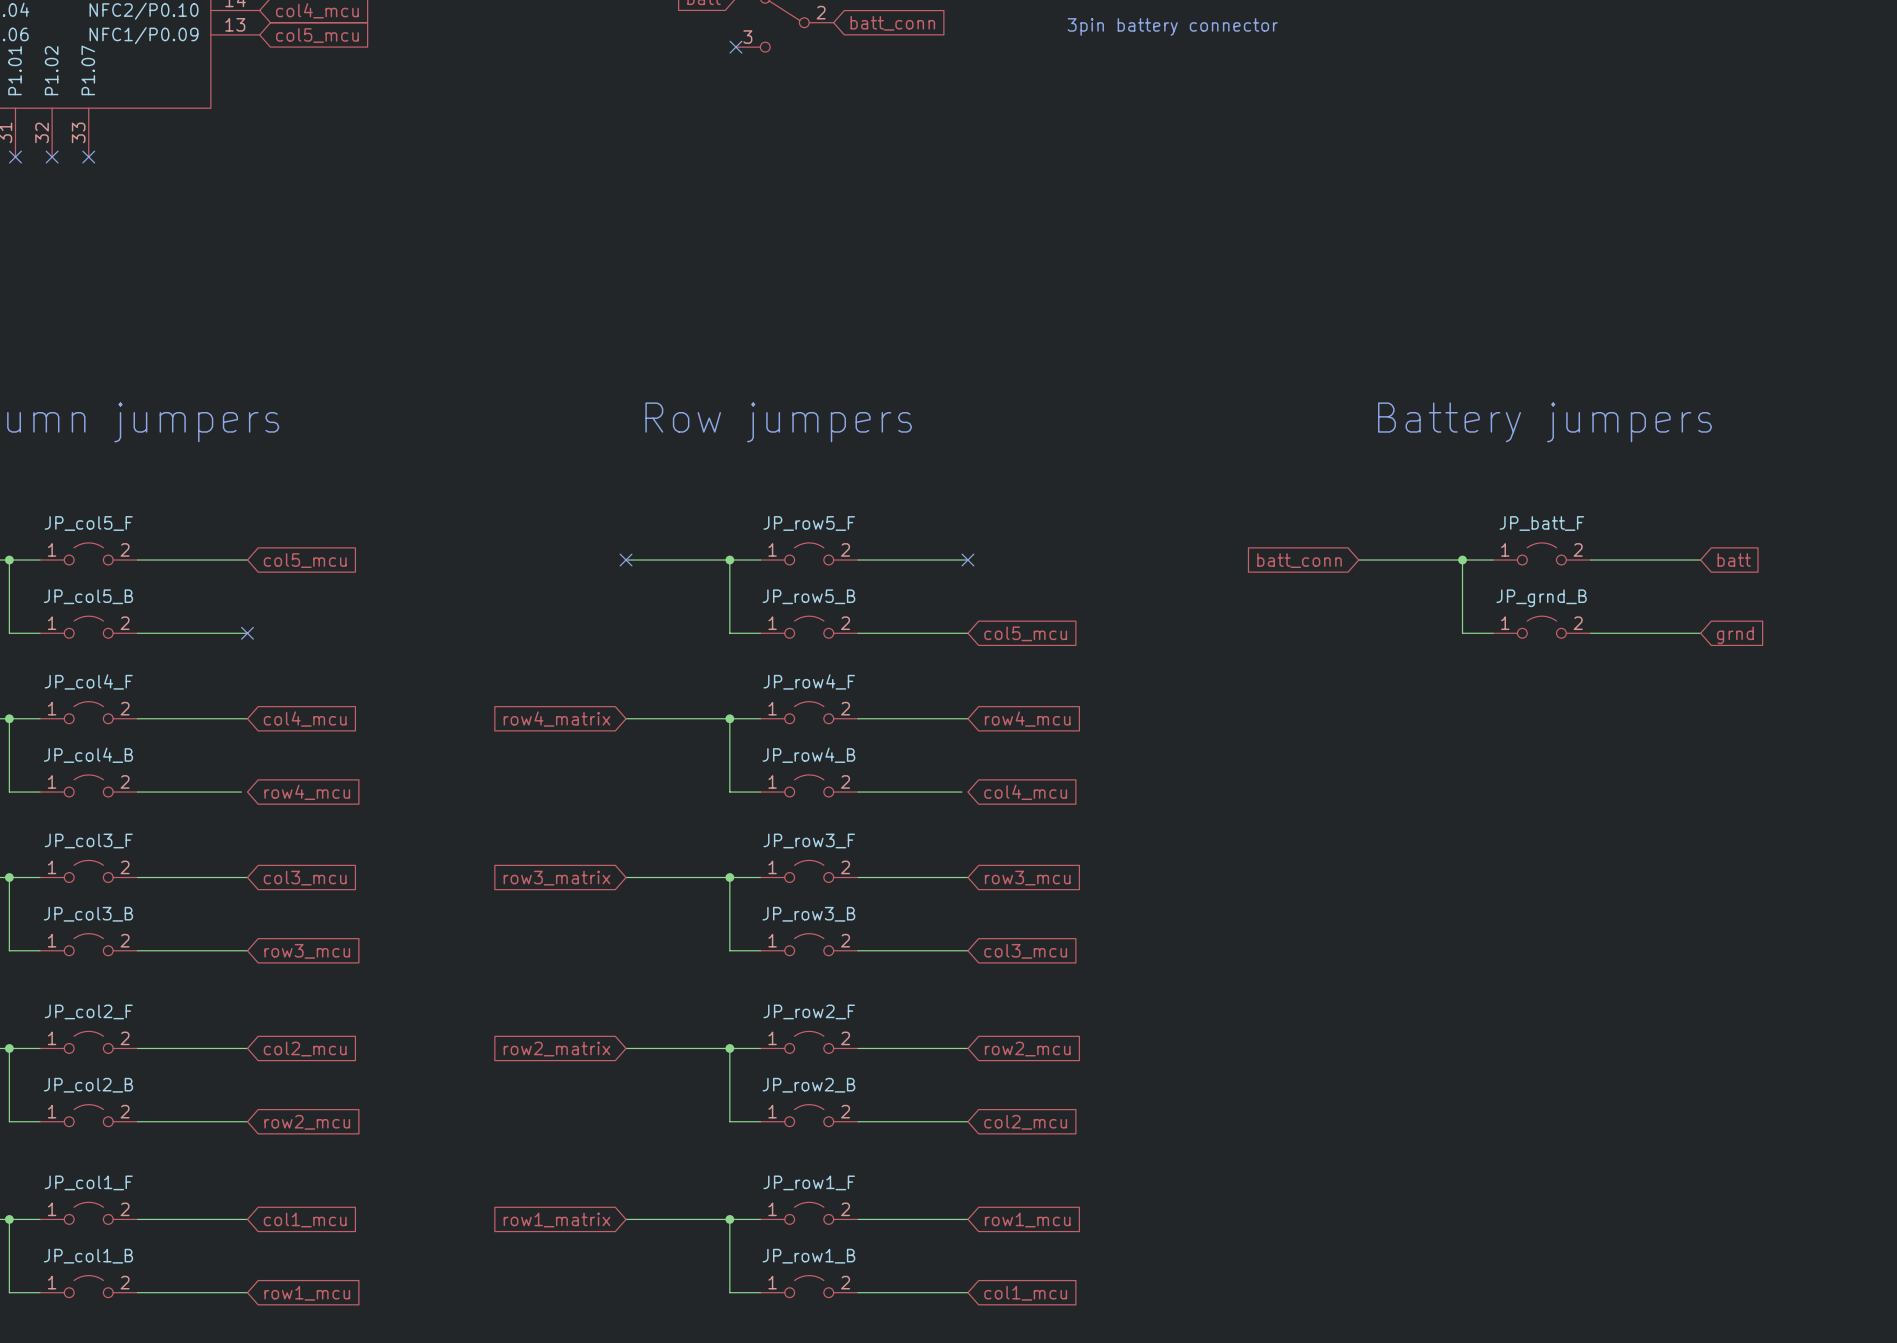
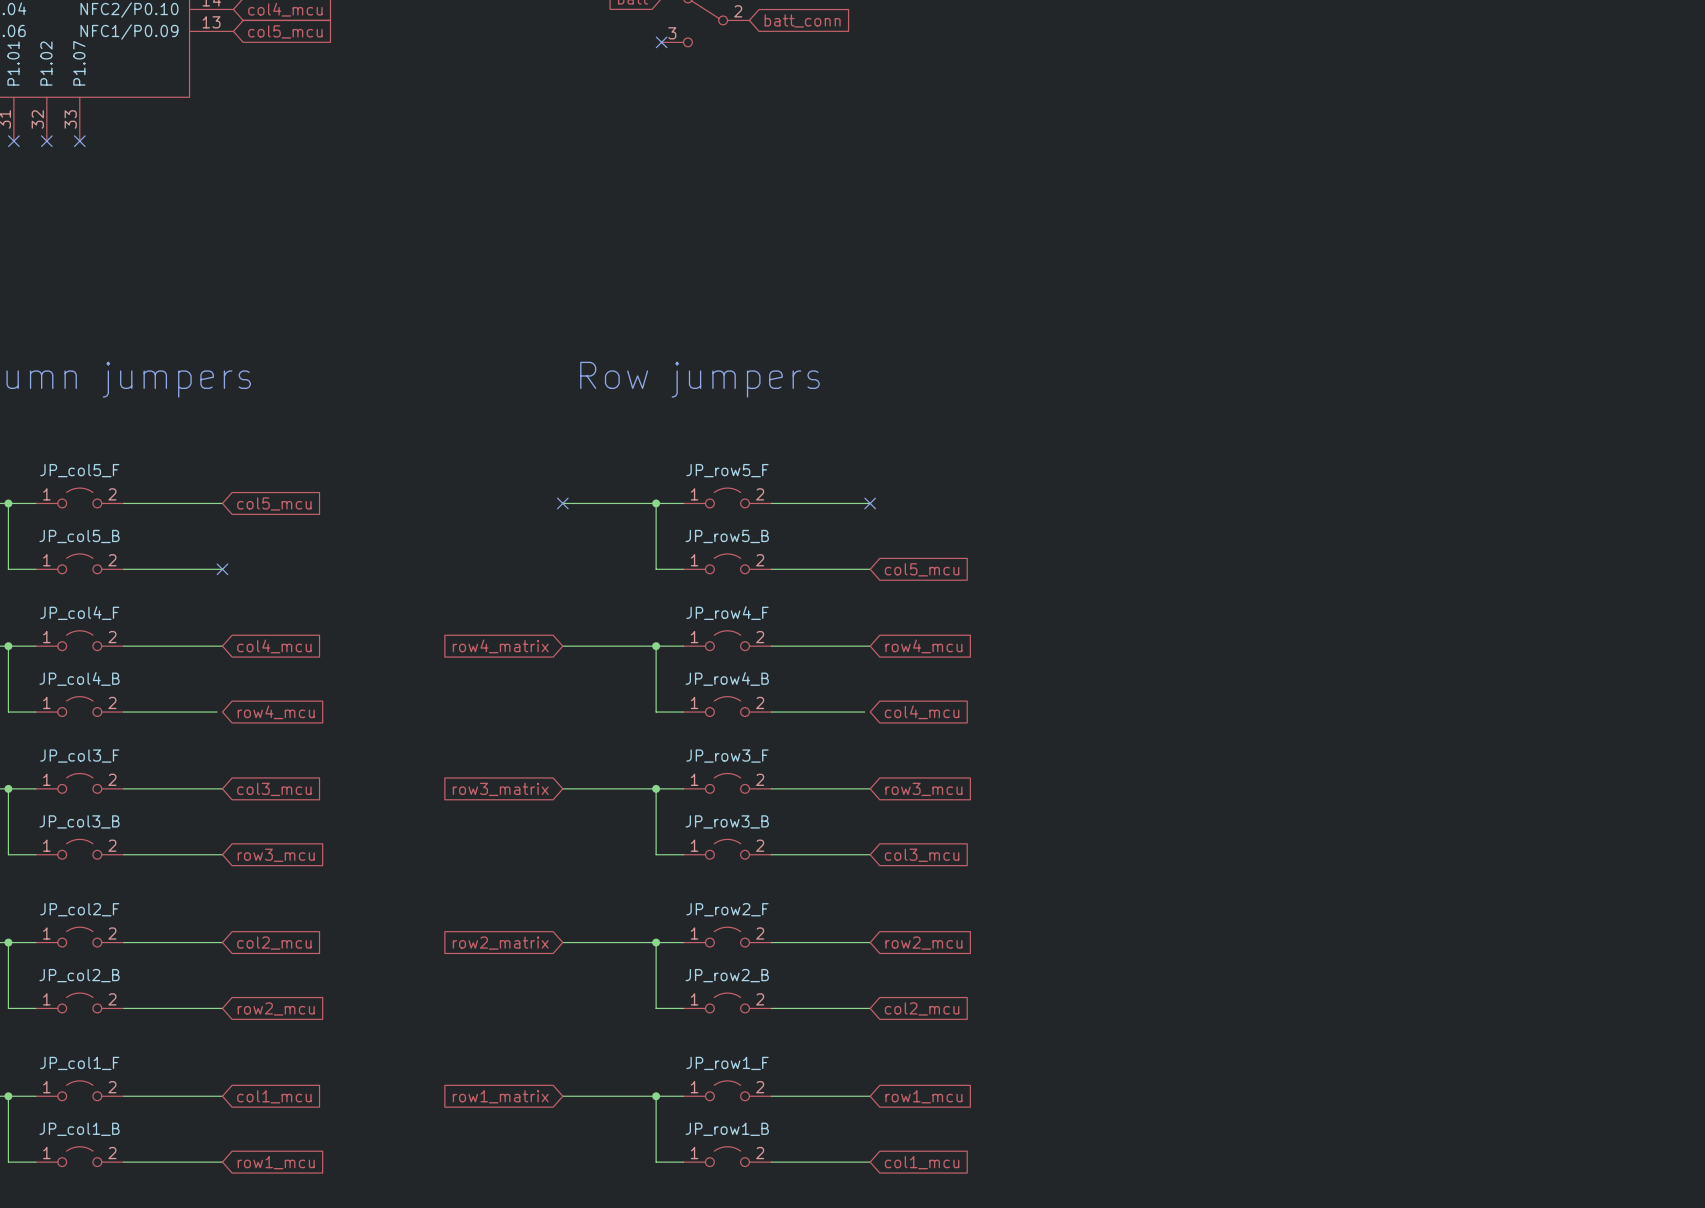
text: 3pin battery connector (1172, 26) -> none
text: Battery jumpers (1544, 422) -> none
JP_batt_F: (1541, 553) -> none
global label: batt_conn (1299, 560) -> none
wire: (1358, 560) (1493, 560) -> none
wire: (1462, 560) (1462, 633) (1493, 633) -> none
junction: (1462, 560) -> none
wire: (1590, 560) (1700, 560) -> none
global label: batt (1734, 560) -> none
JP_grnd_B: (1541, 627) -> none
wire: (1590, 633) (1700, 633) -> none
global label: grnd (1735, 635) -> none

